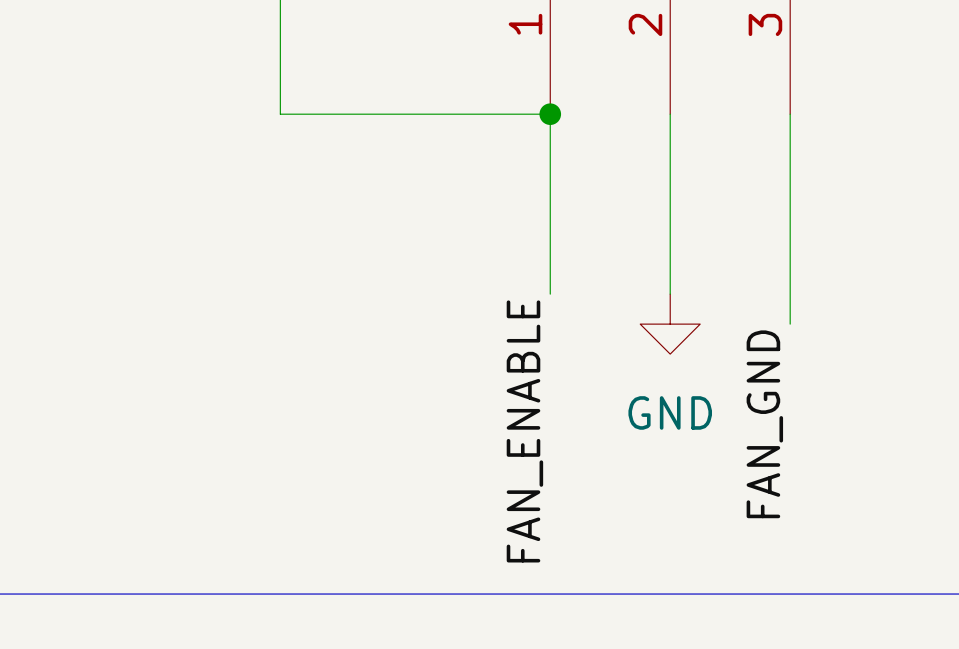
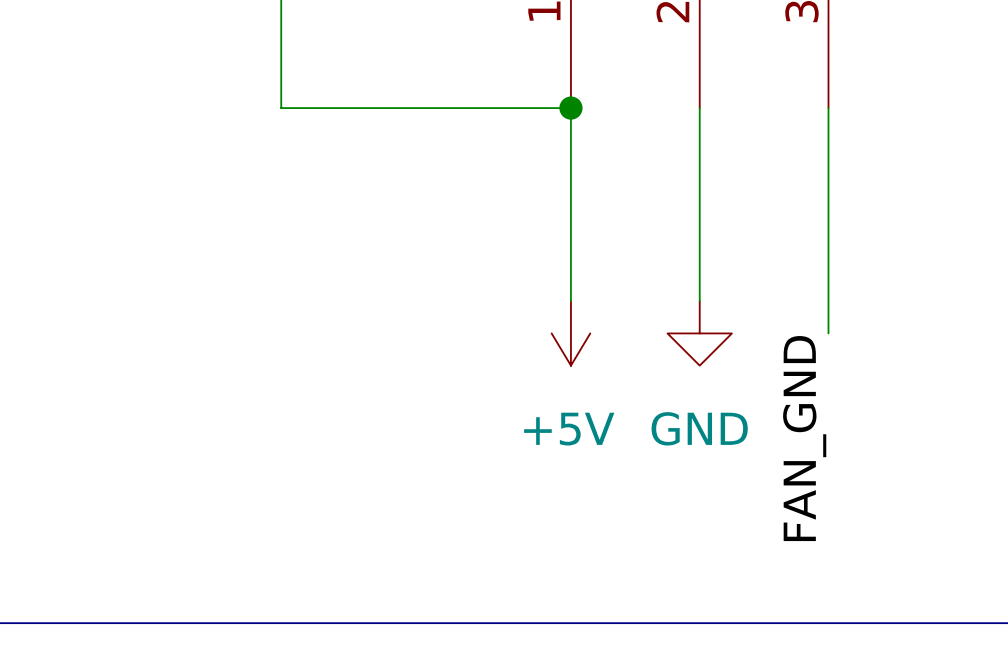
power symbol: none -> +5V (570, 333)
label: FAN_ENABLE (524, 431) -> none

